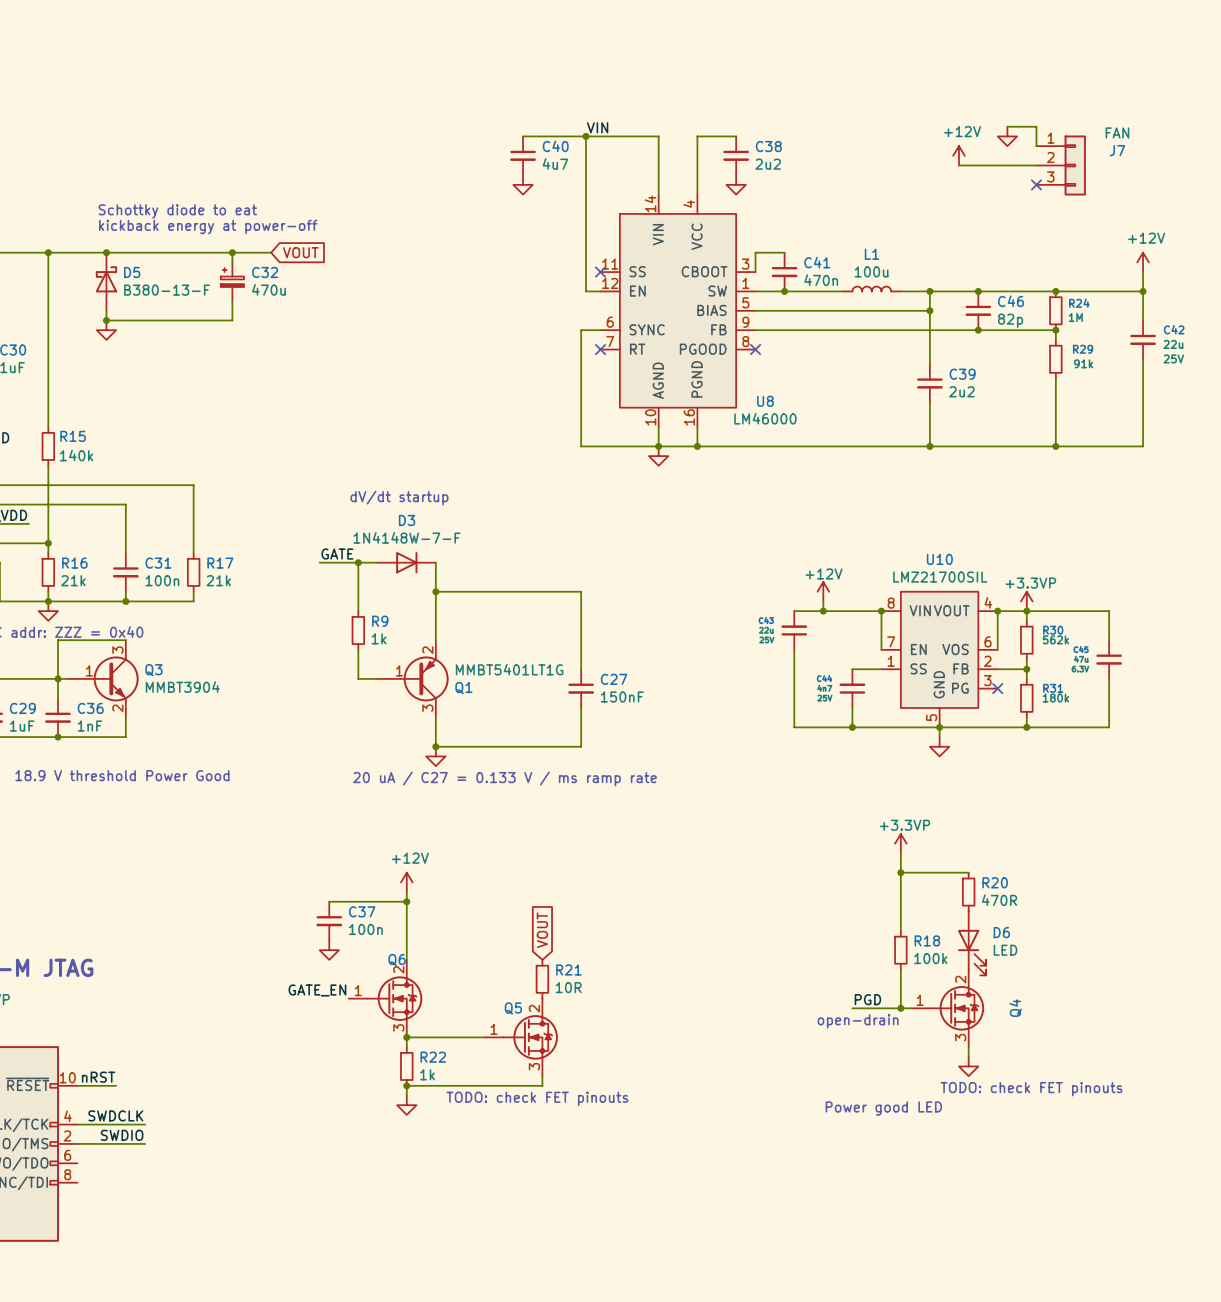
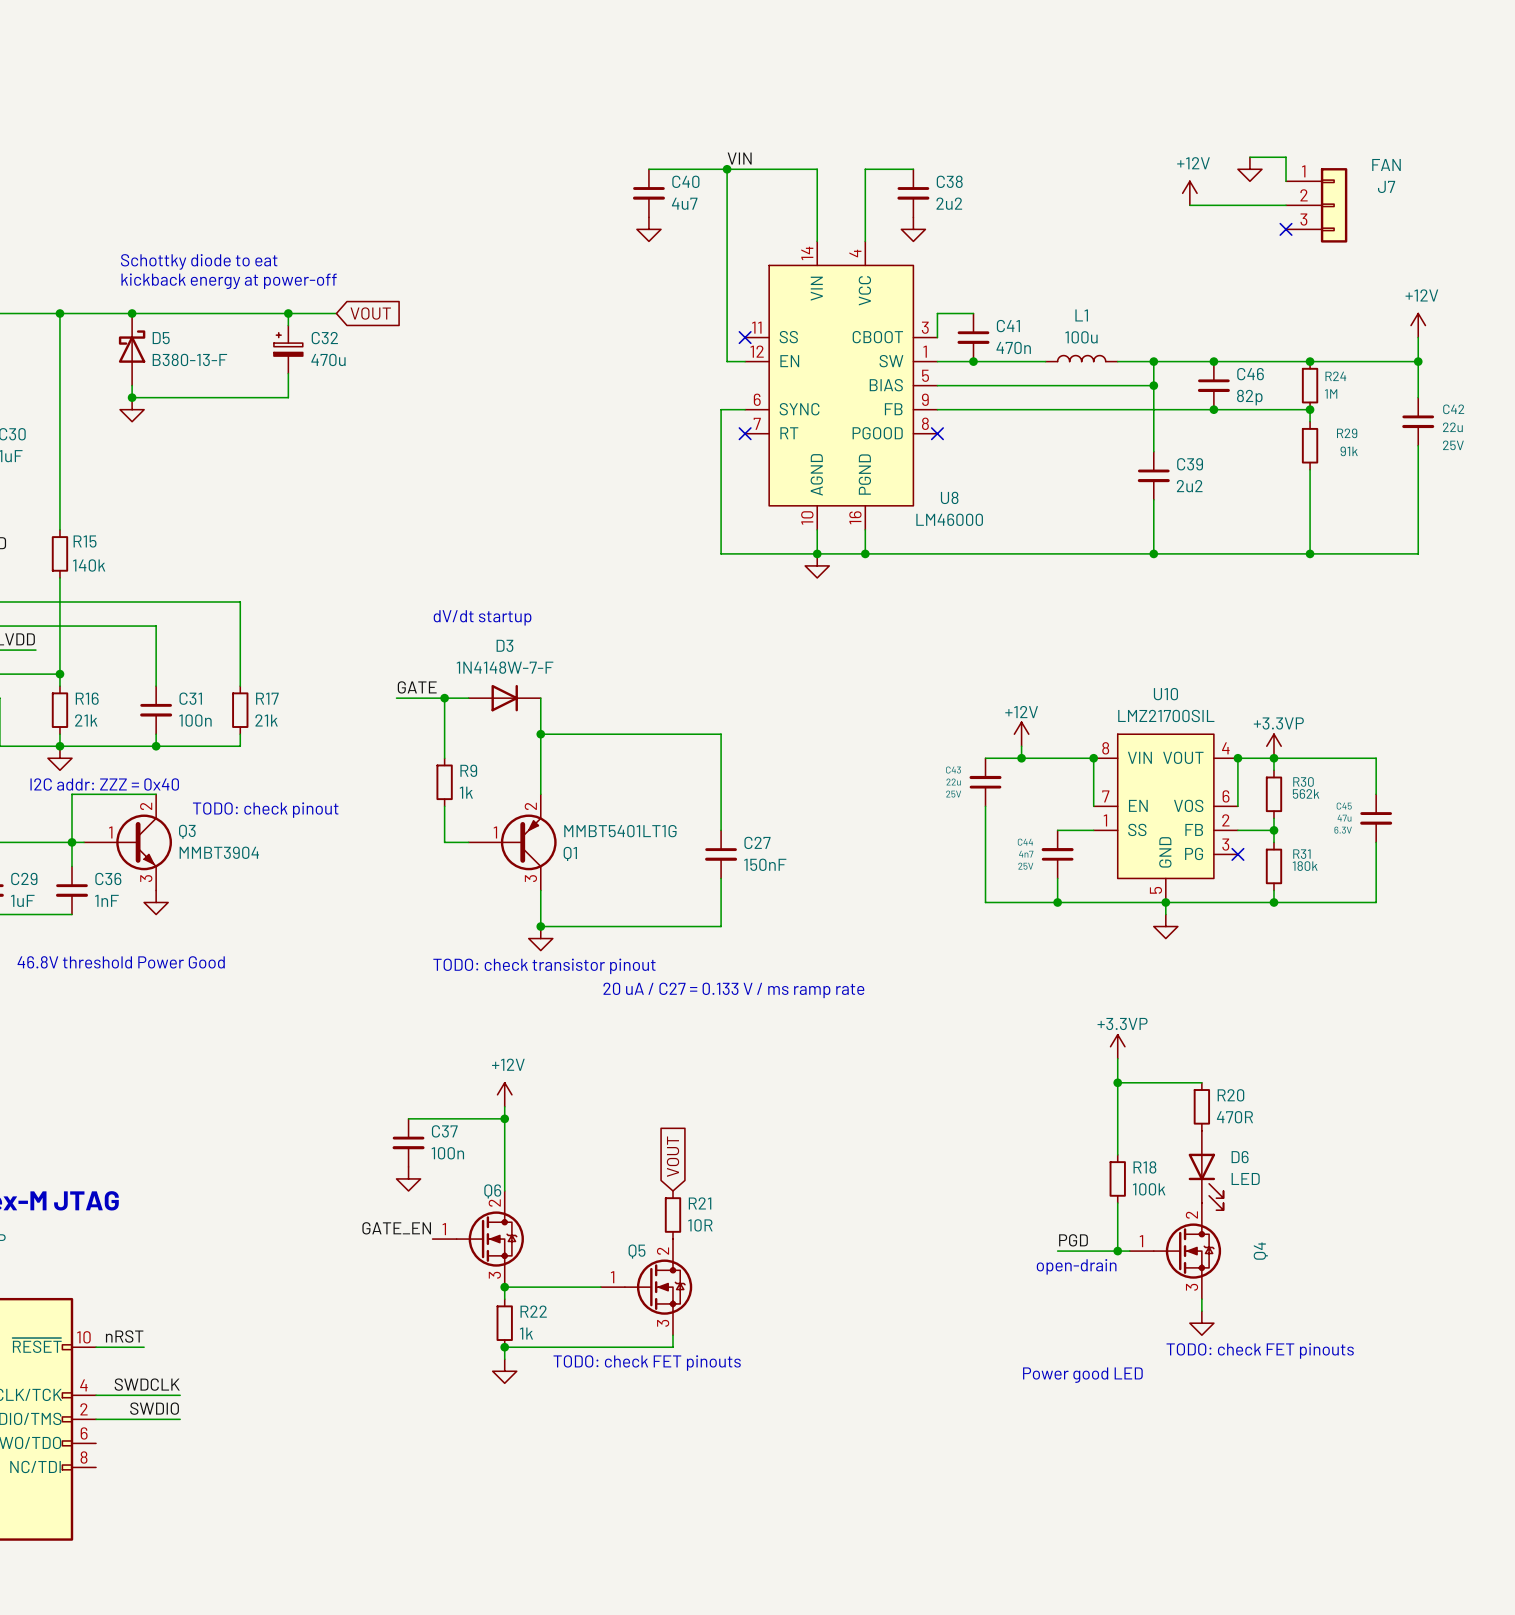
Q3 pin number: 3 (117, 650) -> 2 (146, 806)
text: none -> TODO: check pinout (265, 810)
Q3 pin number: 2 (117, 708) -> 3 (146, 878)
wire: (125, 717) (125, 737) (58, 737) -> none
power symbol: none -> (156, 902)
junction: (58, 737) -> none
text: 18.9 V threshold Power Good (122, 775) -> 46.8V threshold Power Good (121, 962)
text position: 20 uA / C27 = 0.133 V / ms ramp rate (504, 778) -> 20 uA / C27 = 0.133 V / ms ramp rate (733, 990)
text: none -> TODO: check transistor pinout (544, 966)

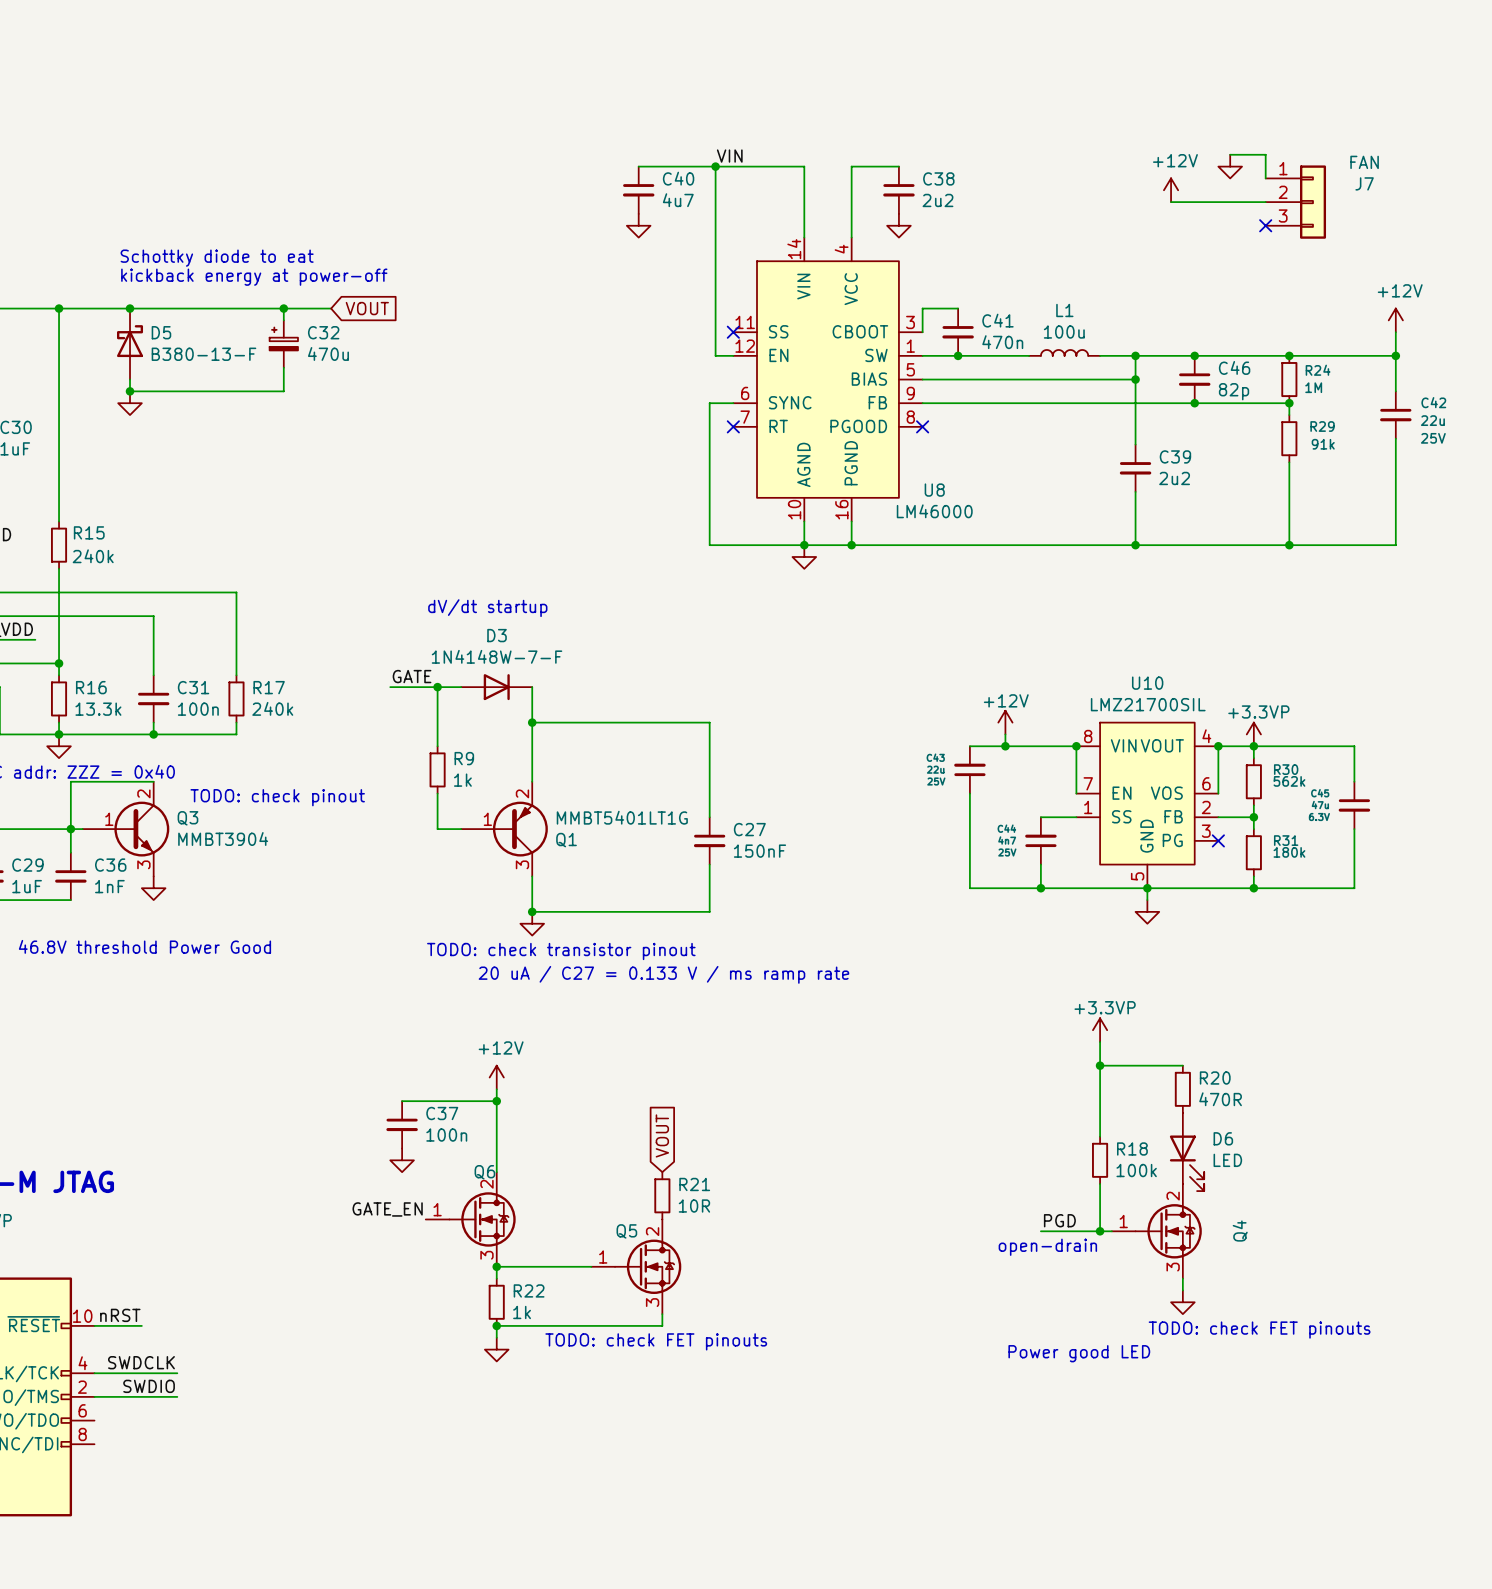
R15 value: 140k (89, 565) -> 240k (93, 556)
R16 value: 21k (86, 720) -> 13.3k (98, 709)
R17 value: 21k (266, 720) -> 240k (272, 708)

